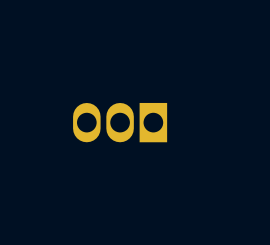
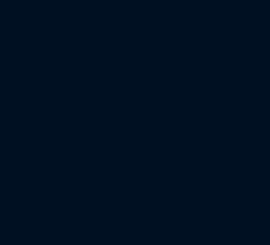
part: (120, 122) -> none

